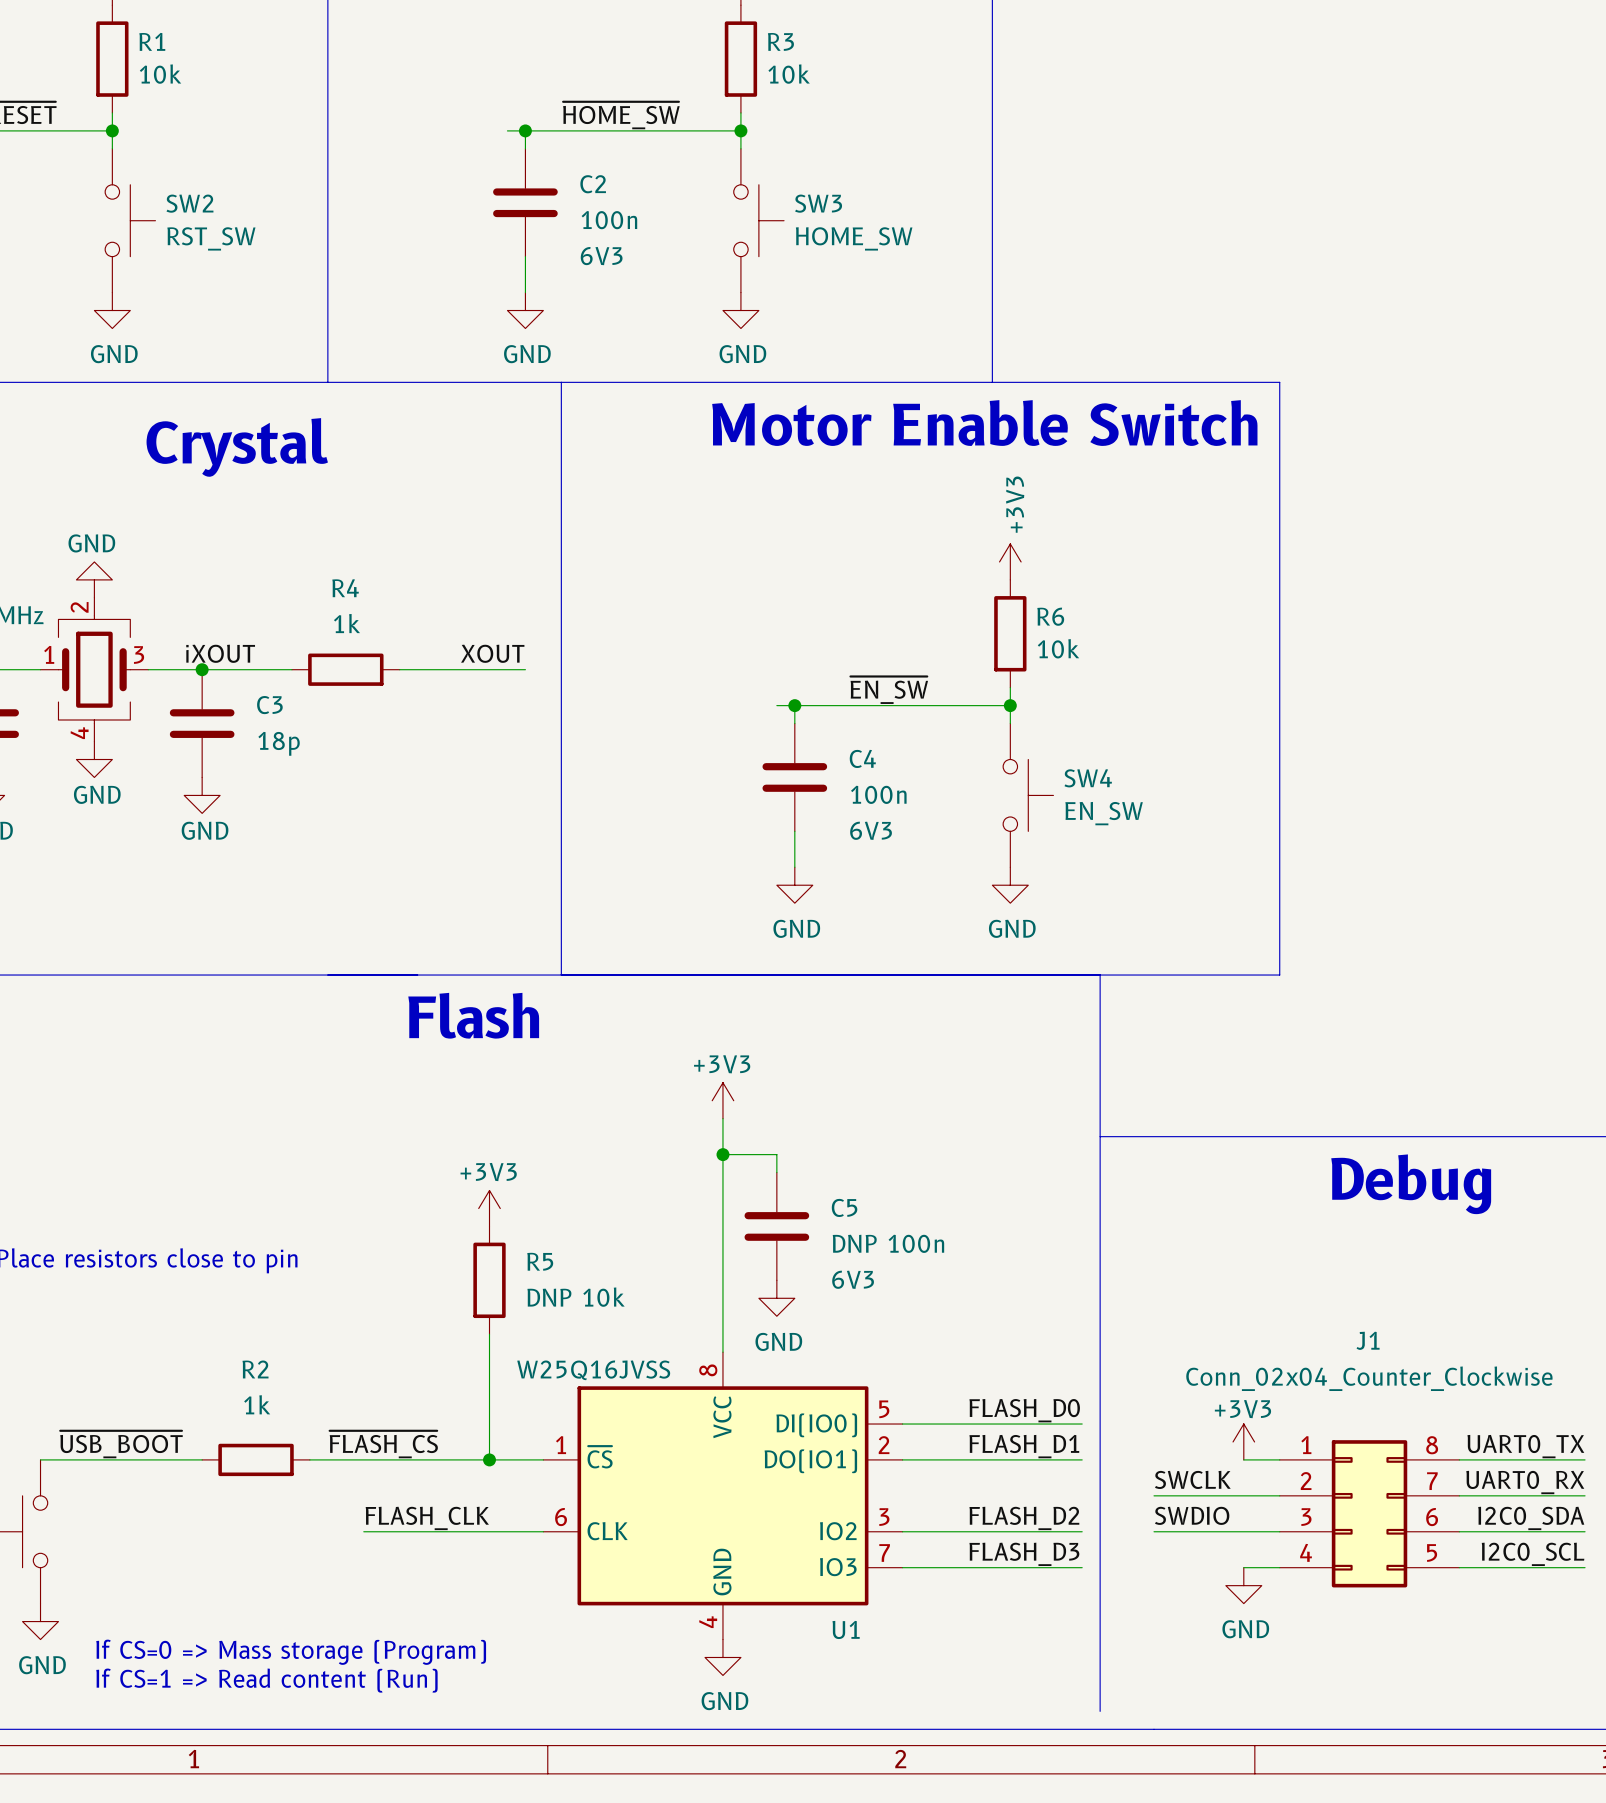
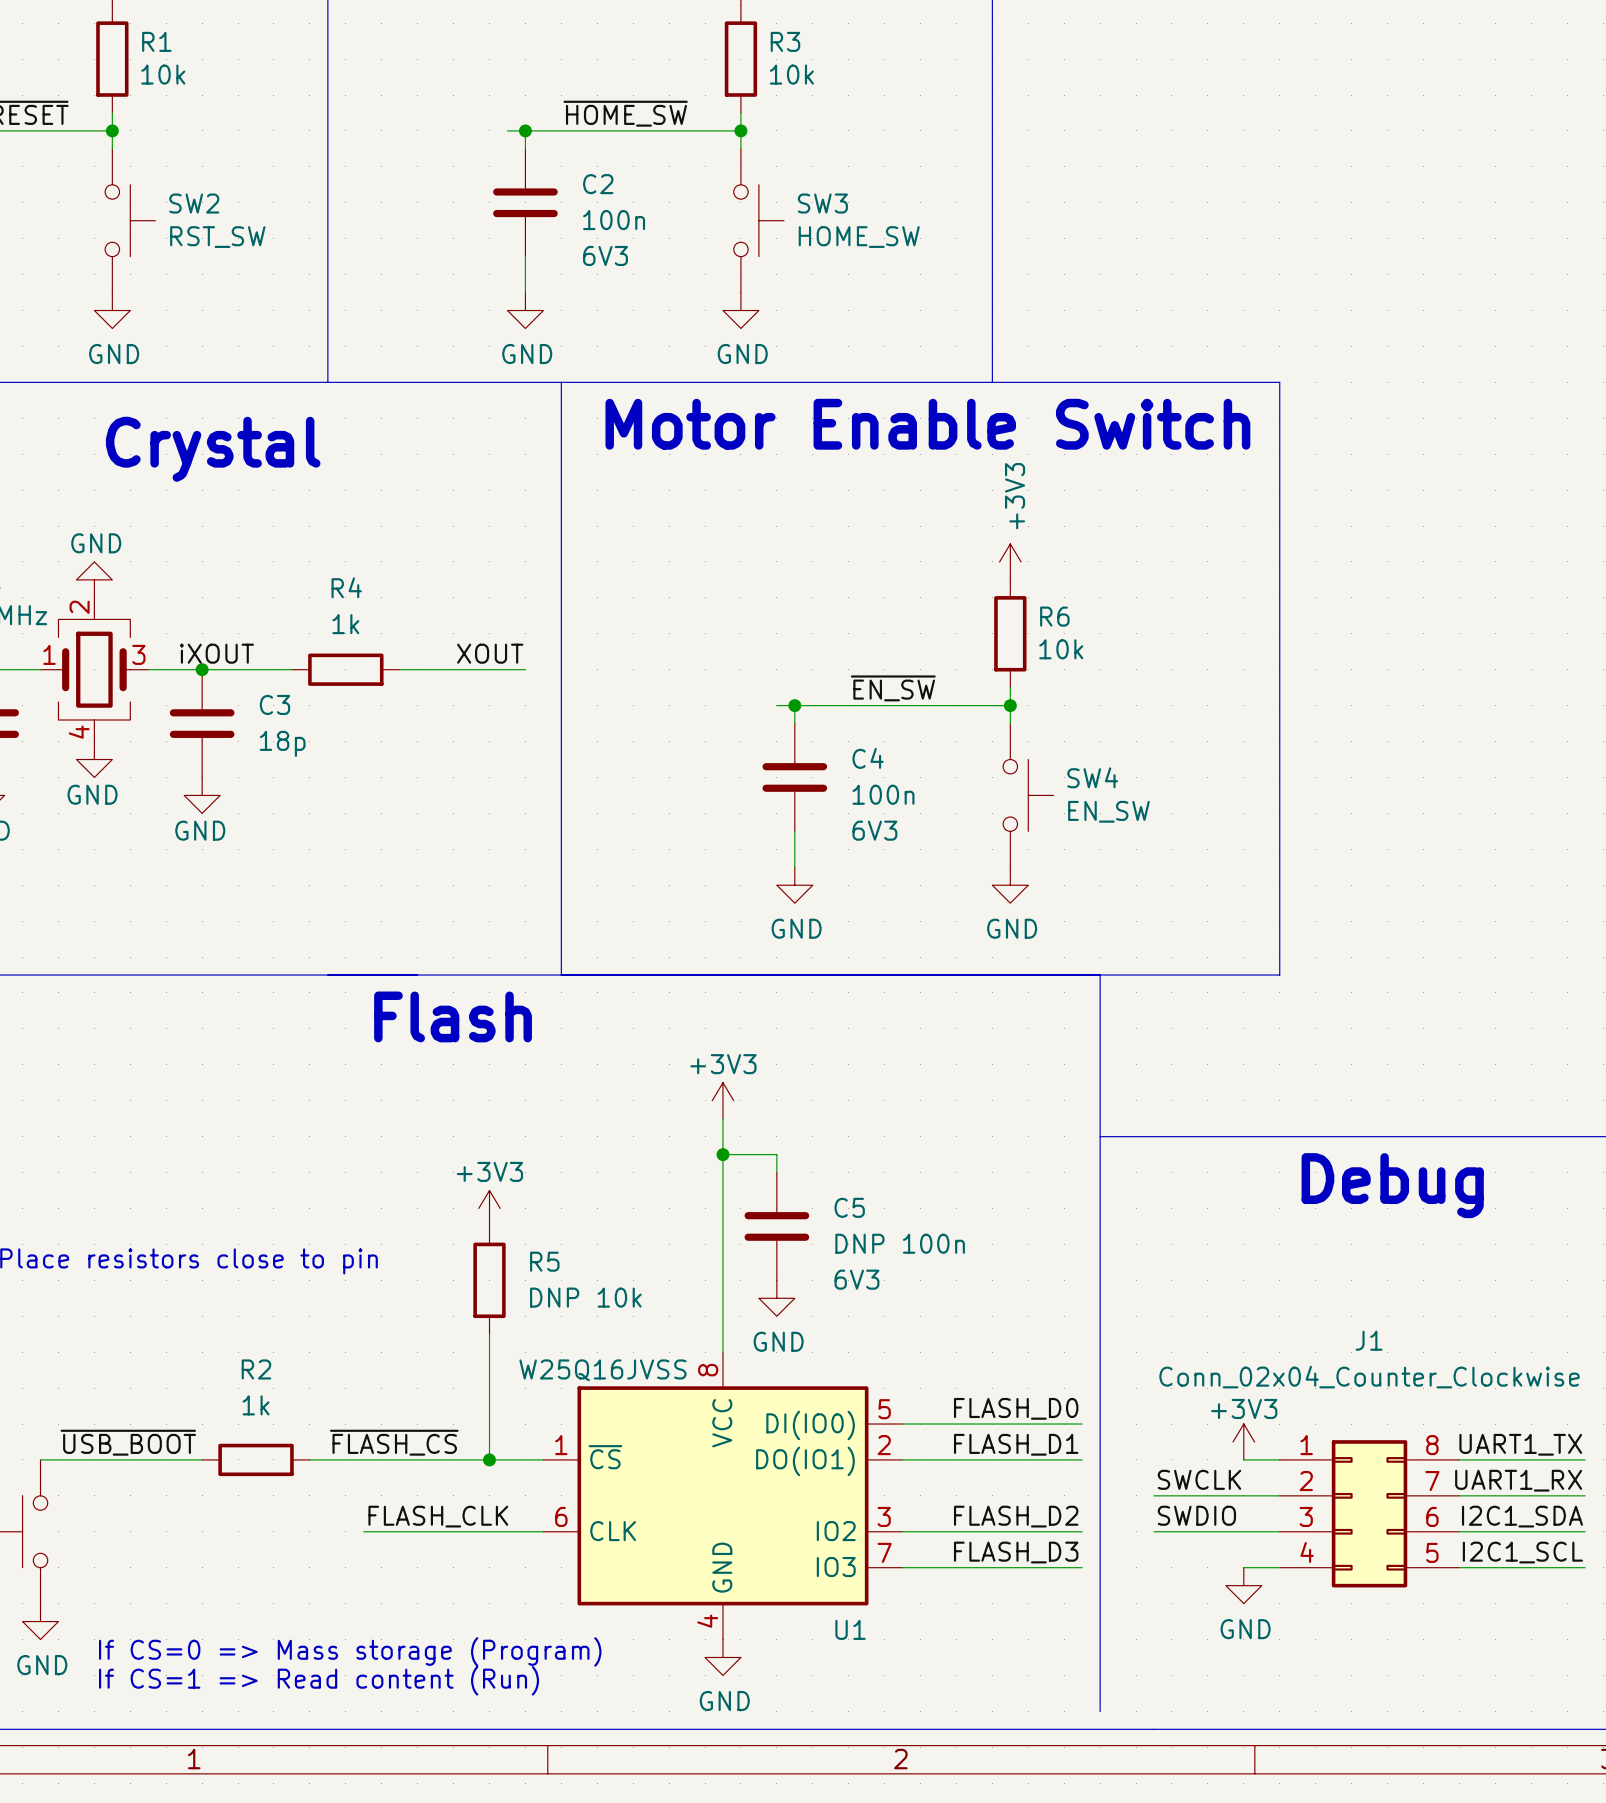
label: UART0_TX (1525, 1446) -> UART1_TX (1520, 1444)
label: UART0_RX (1525, 1482) -> UART1_RX (1518, 1480)
label: I2C0_SDA (1531, 1518) -> I2C1_SDA (1522, 1516)
label: I2C0_SCL (1533, 1554) -> I2C1_SCL (1522, 1552)

